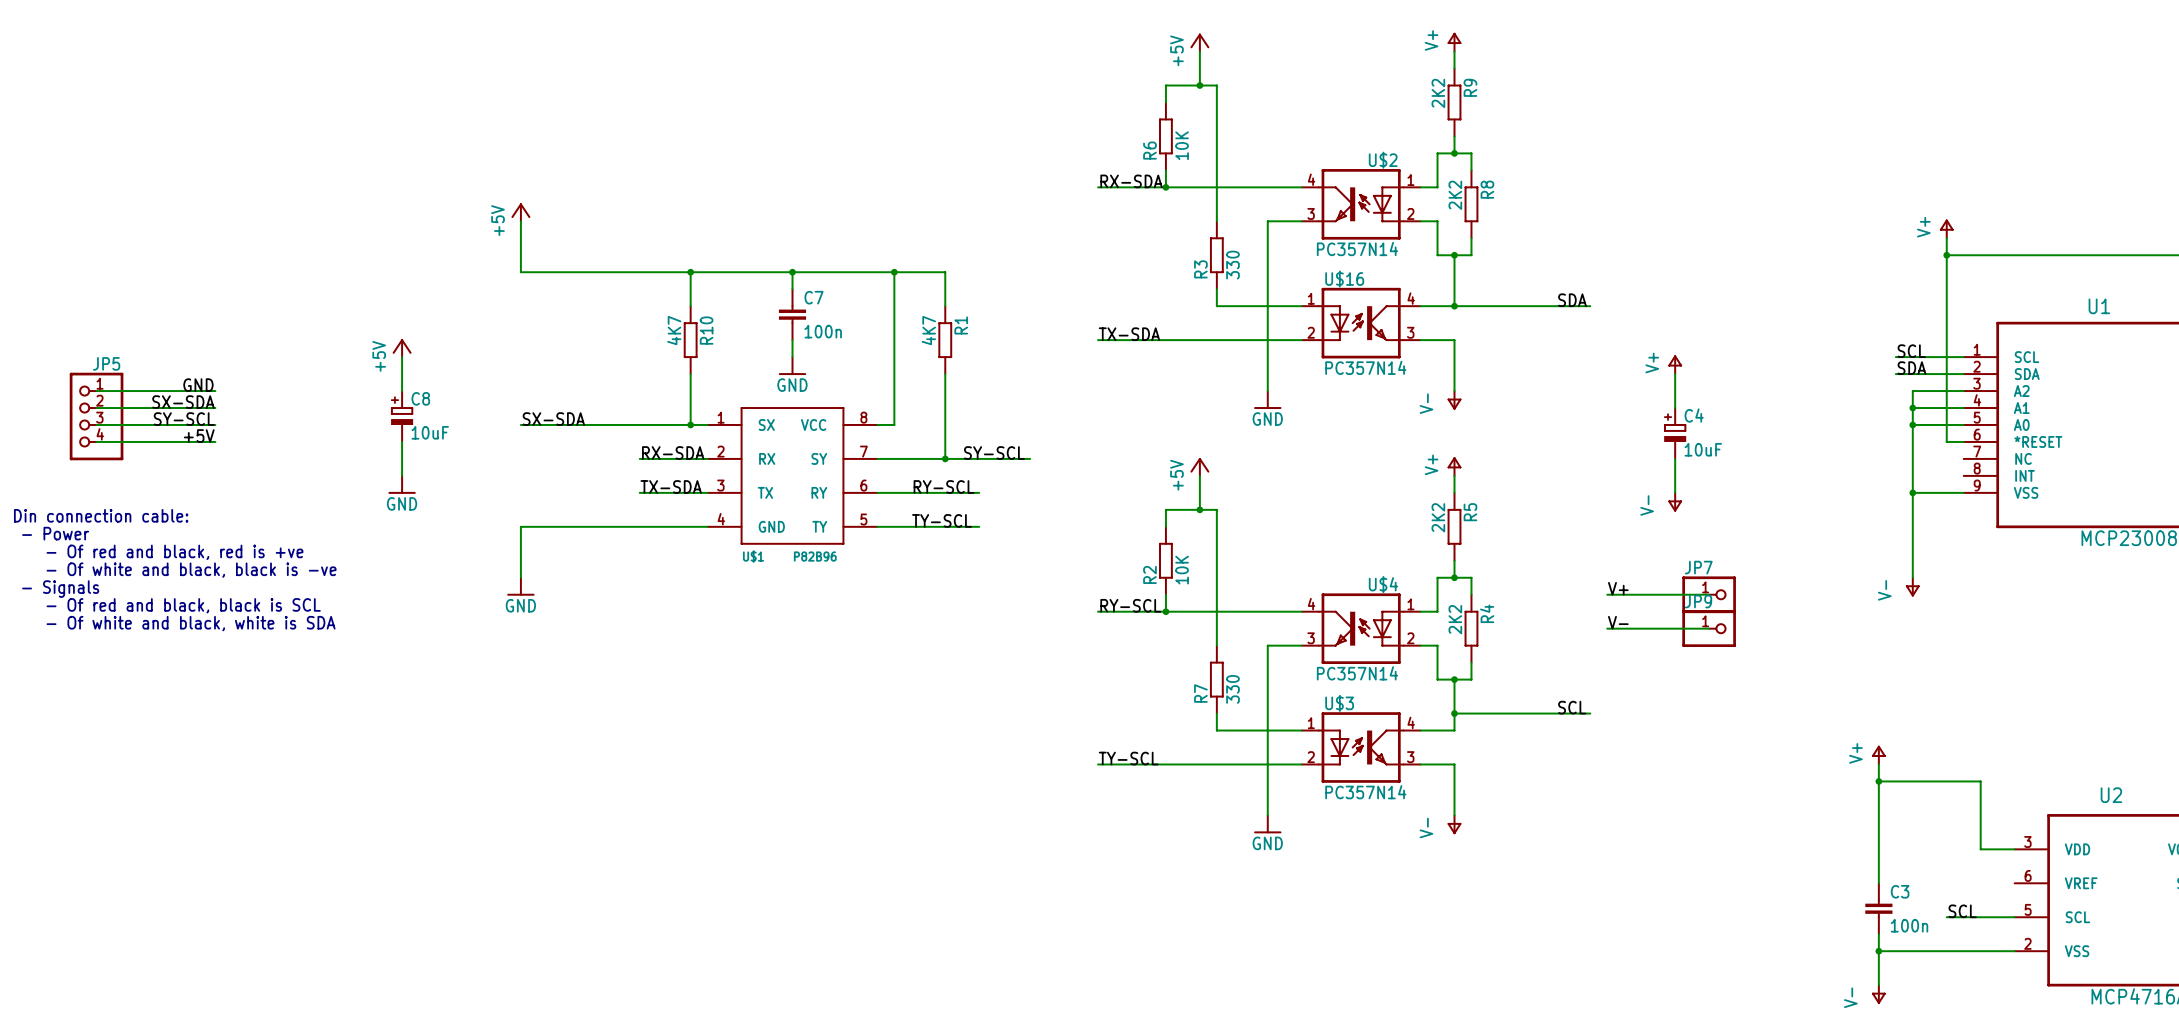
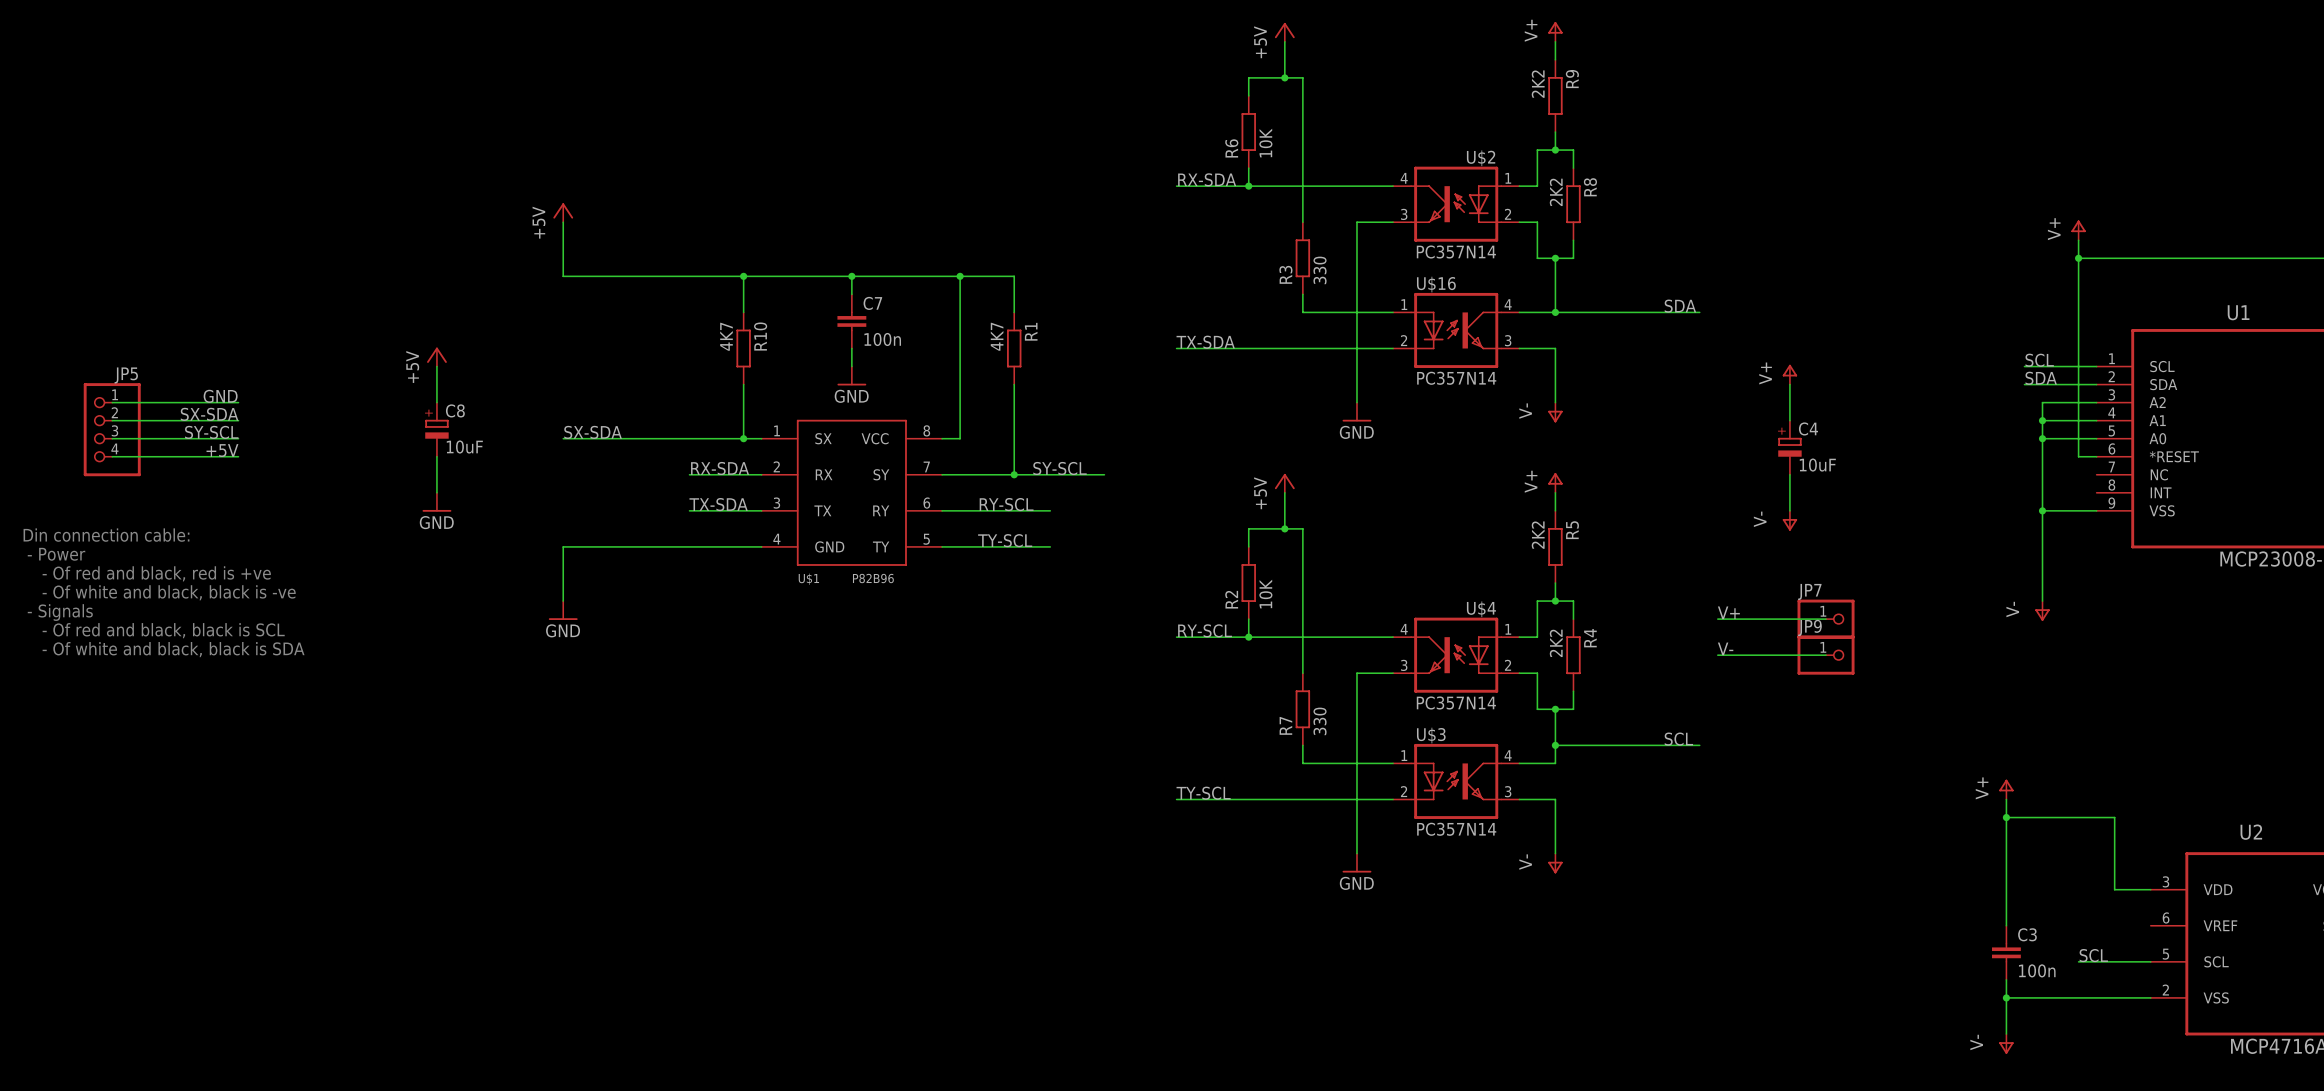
text: - Of white and black, white is SDA (191, 623) -> - Of white and black, black is SDA (173, 649)

